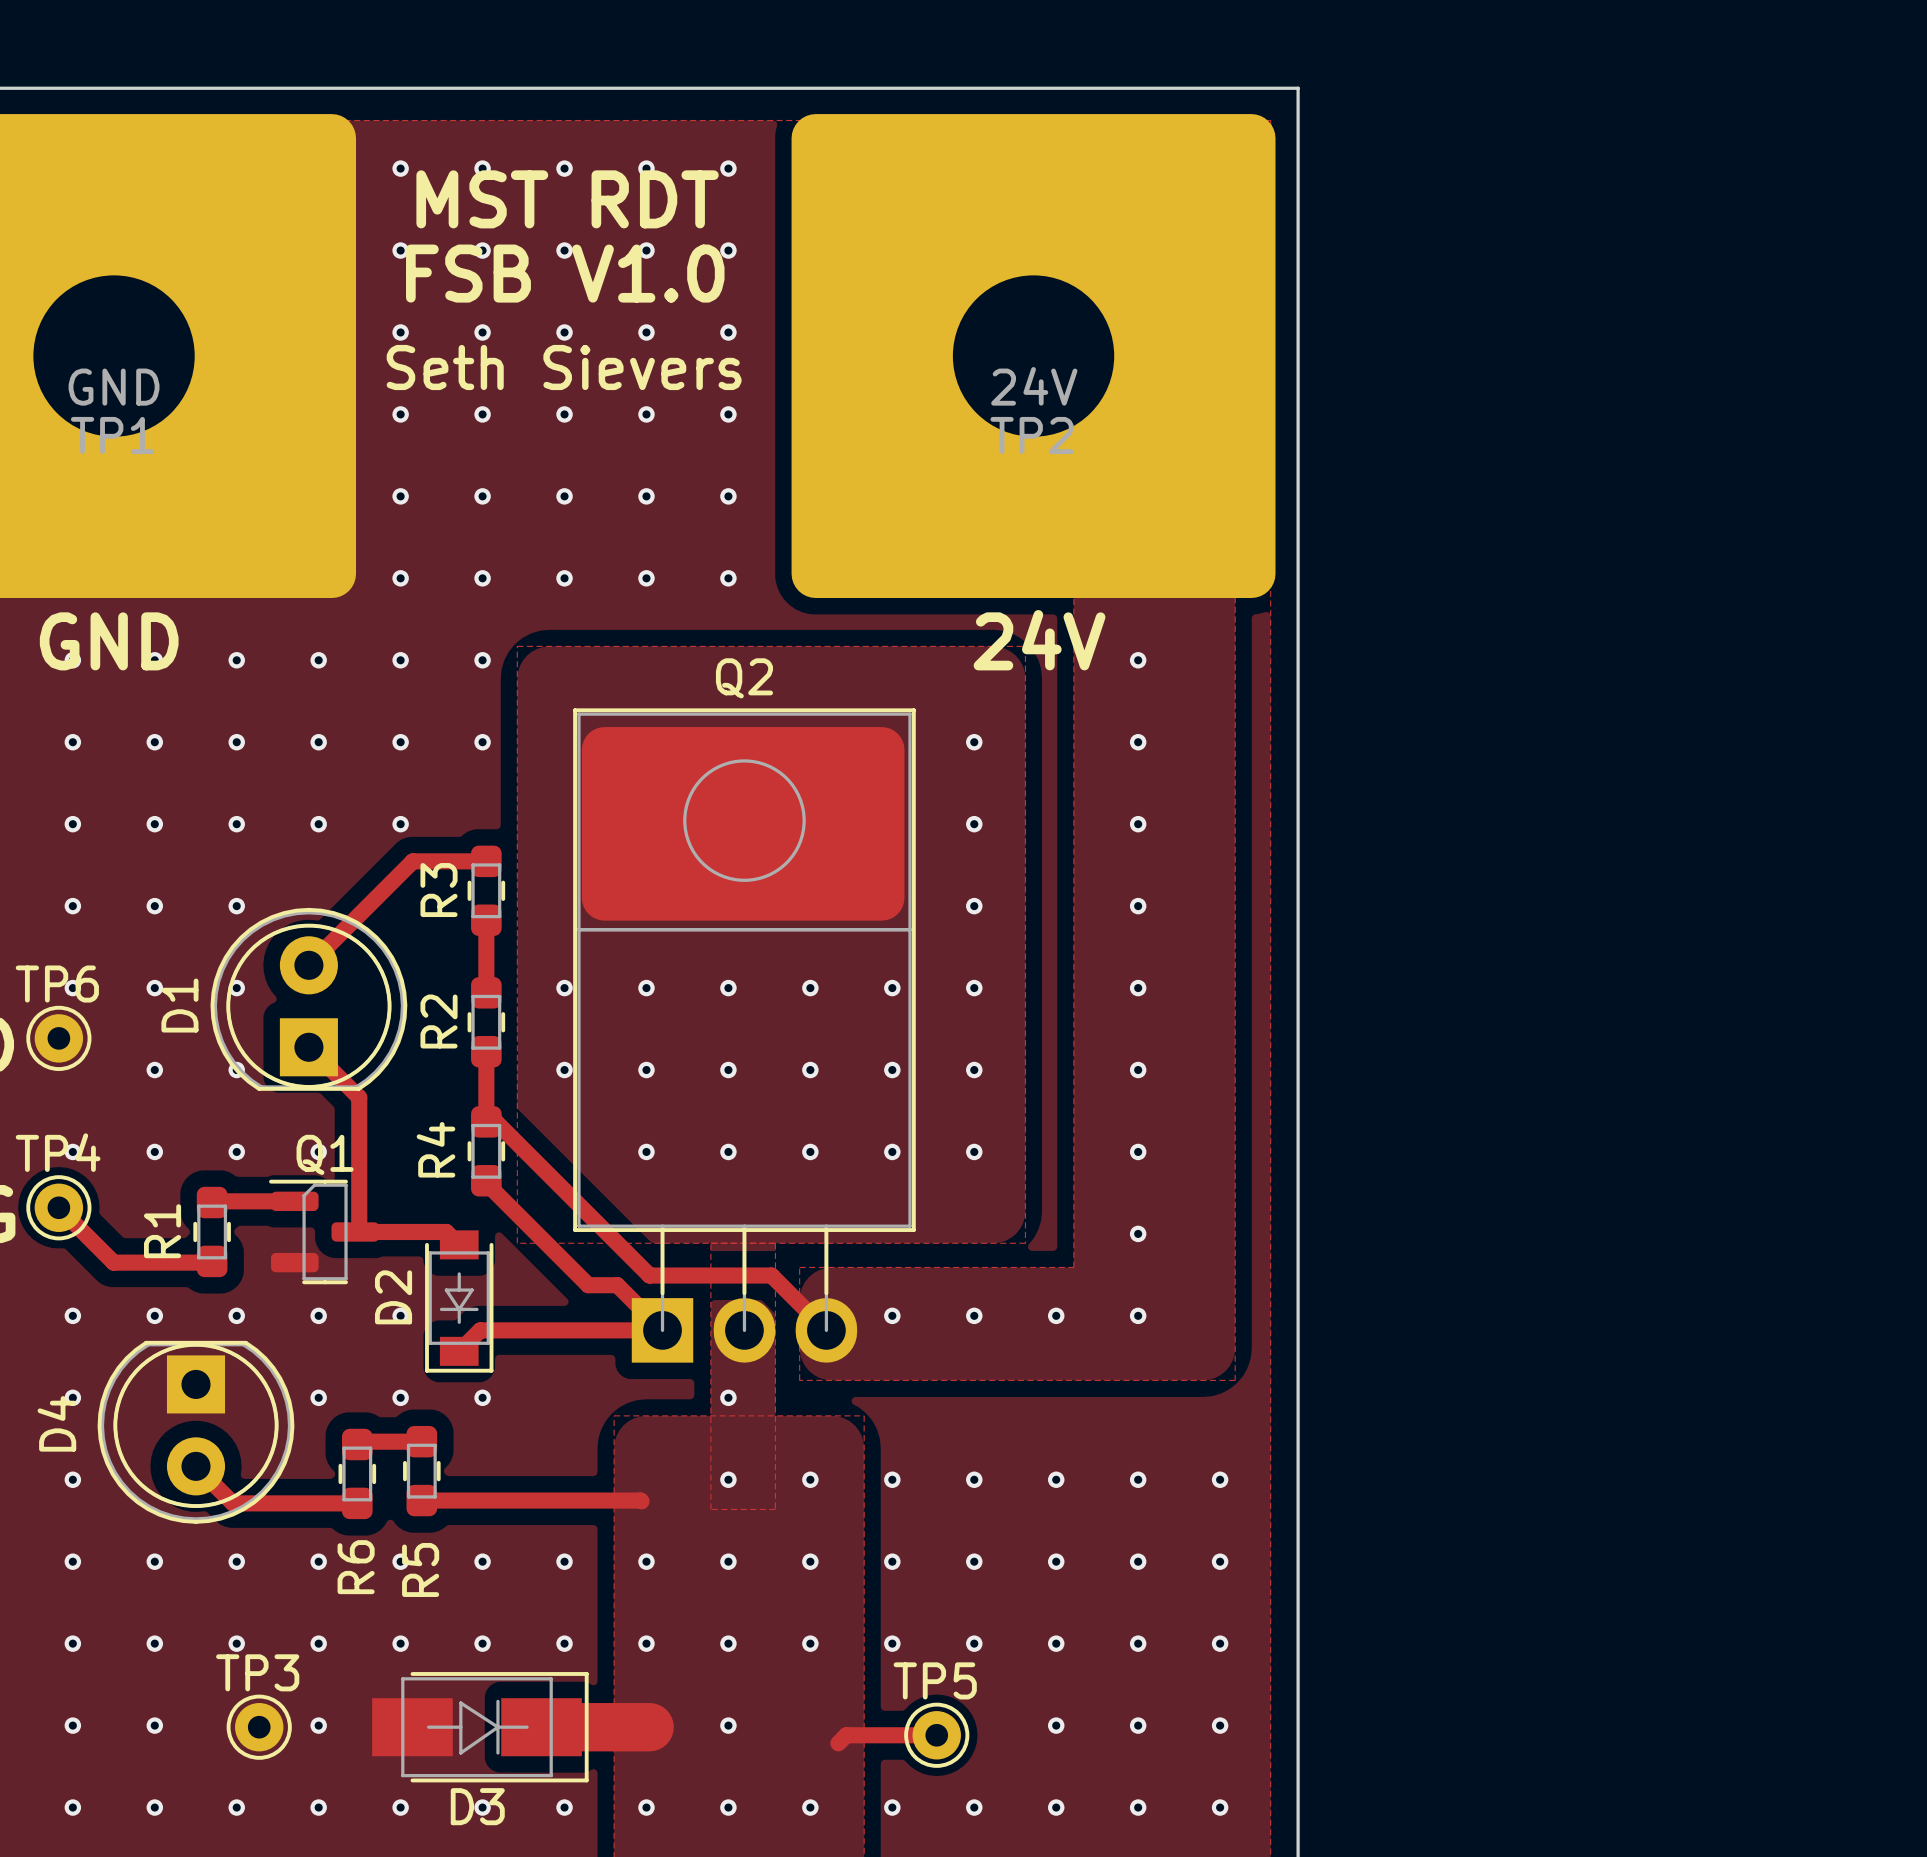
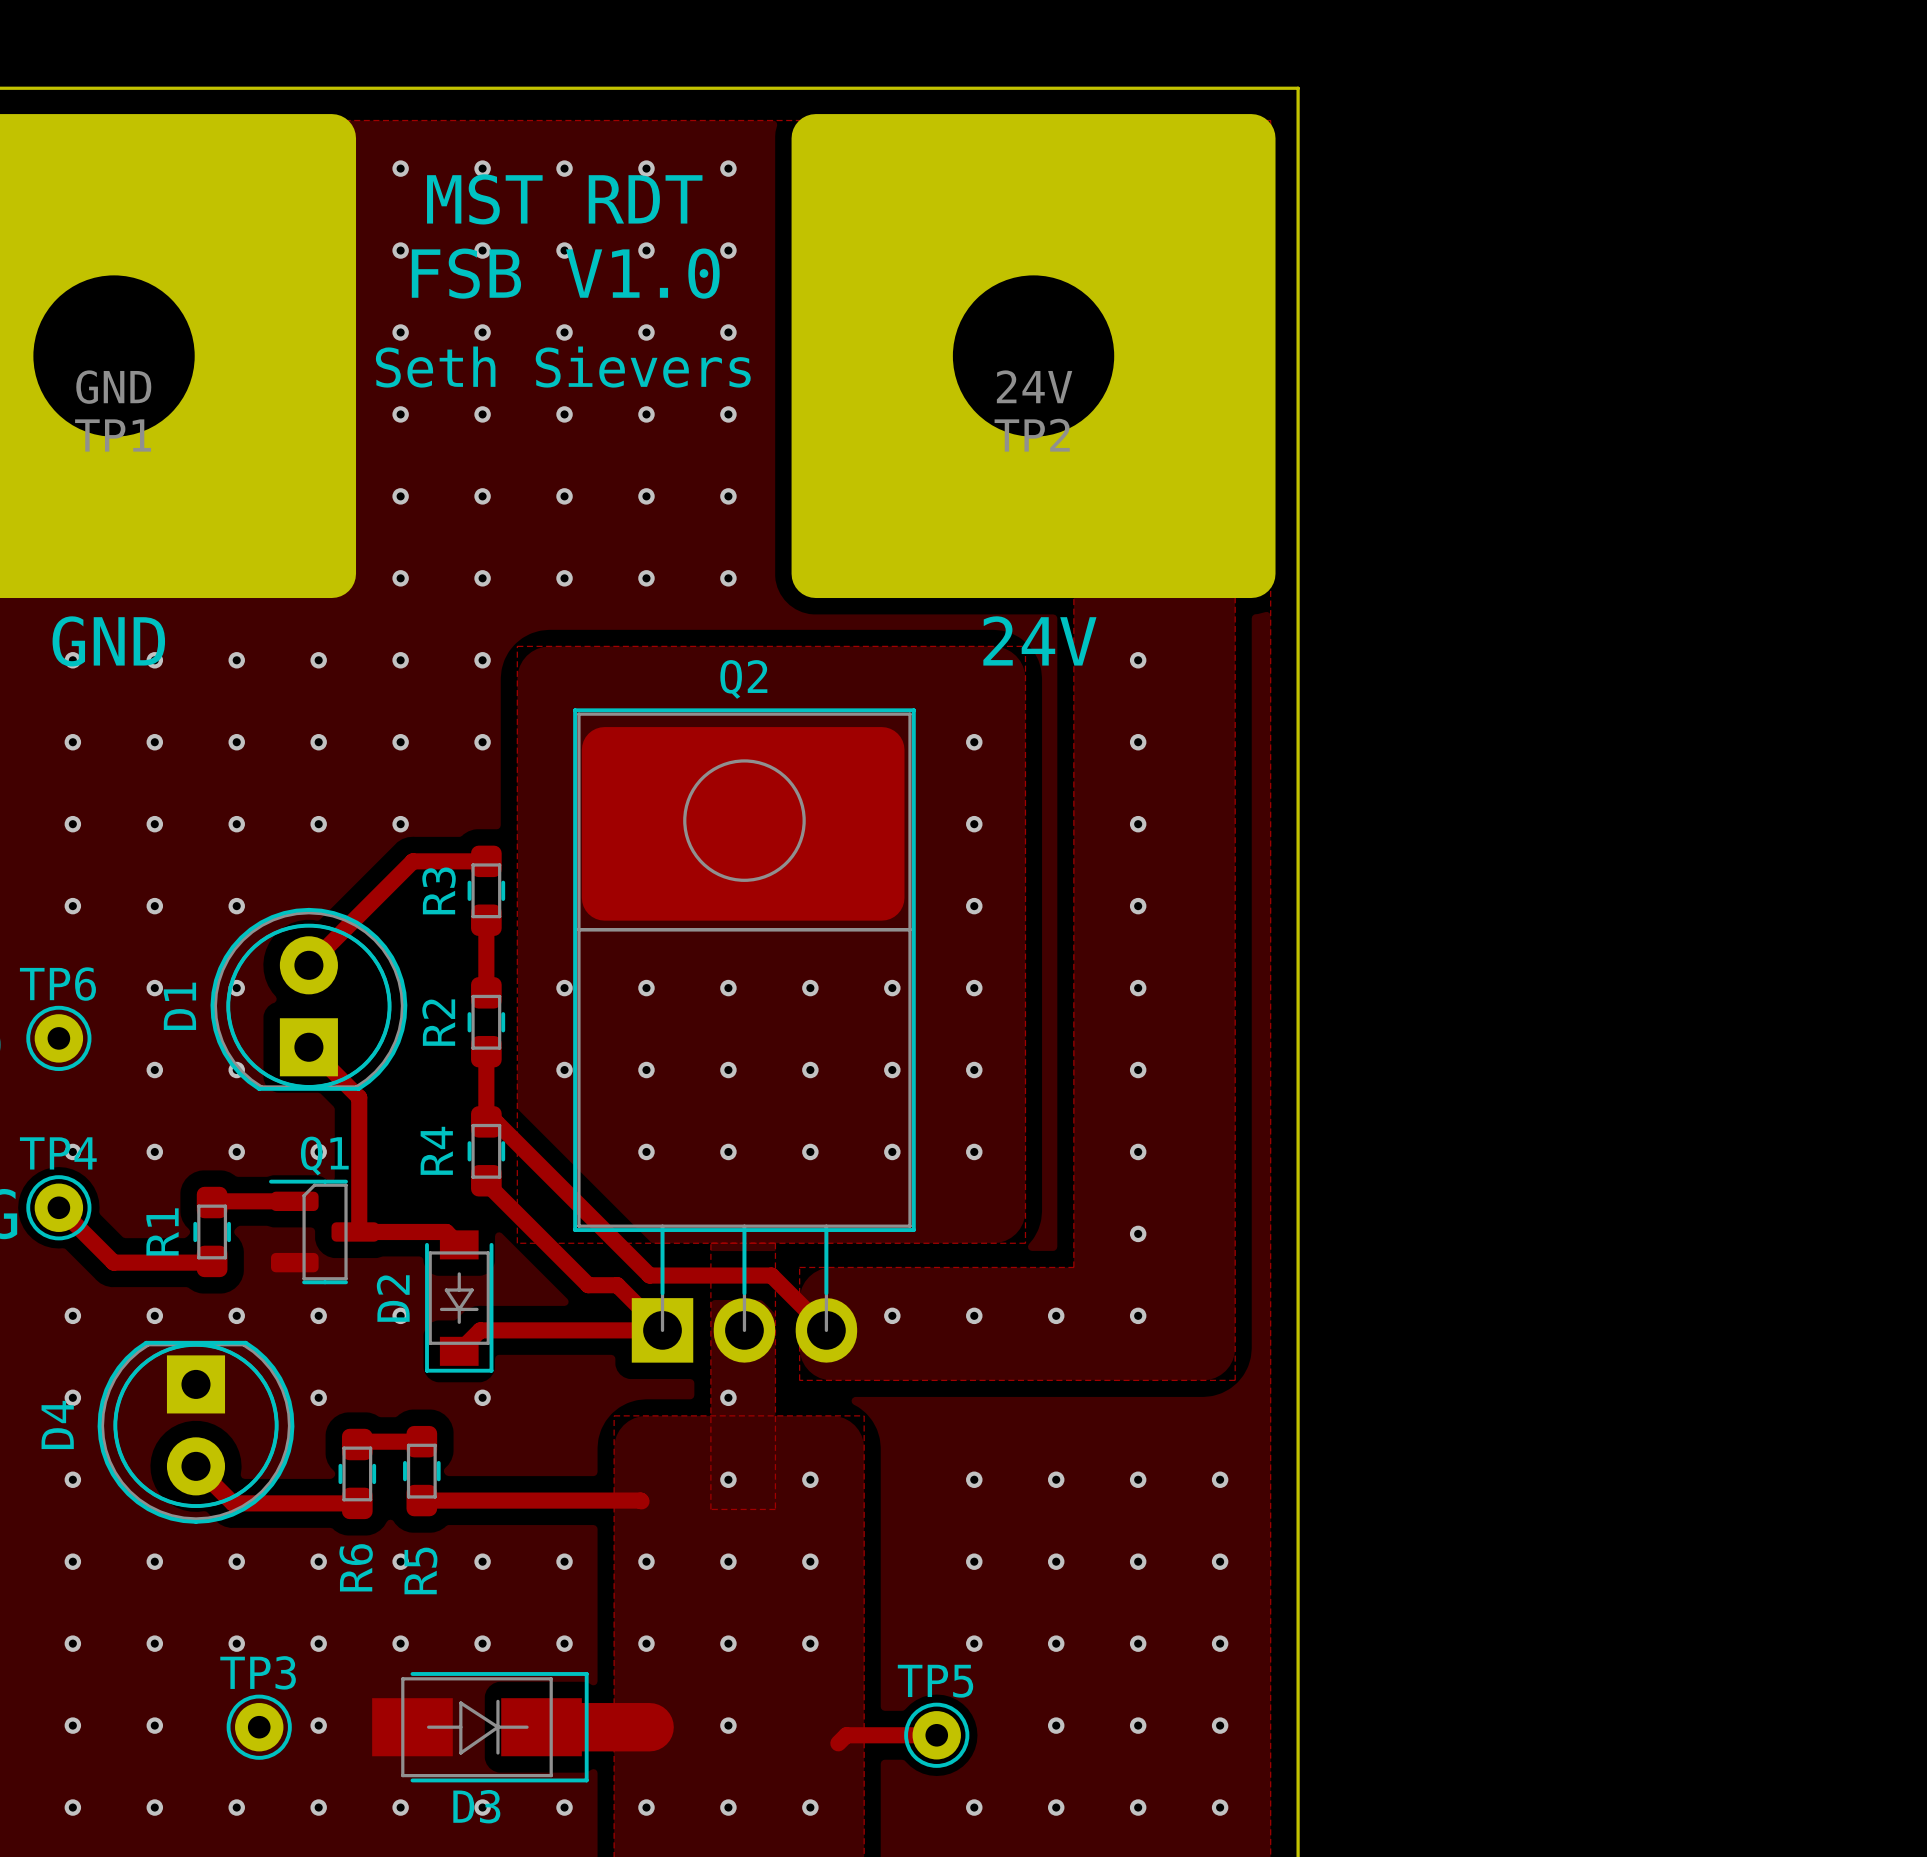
via: (72, 988) -> none
via: (400, 1397) -> none
via: (892, 1479) -> none
via: (892, 1561) -> none
via: (892, 1643) -> none
via: (892, 1807) -> none

